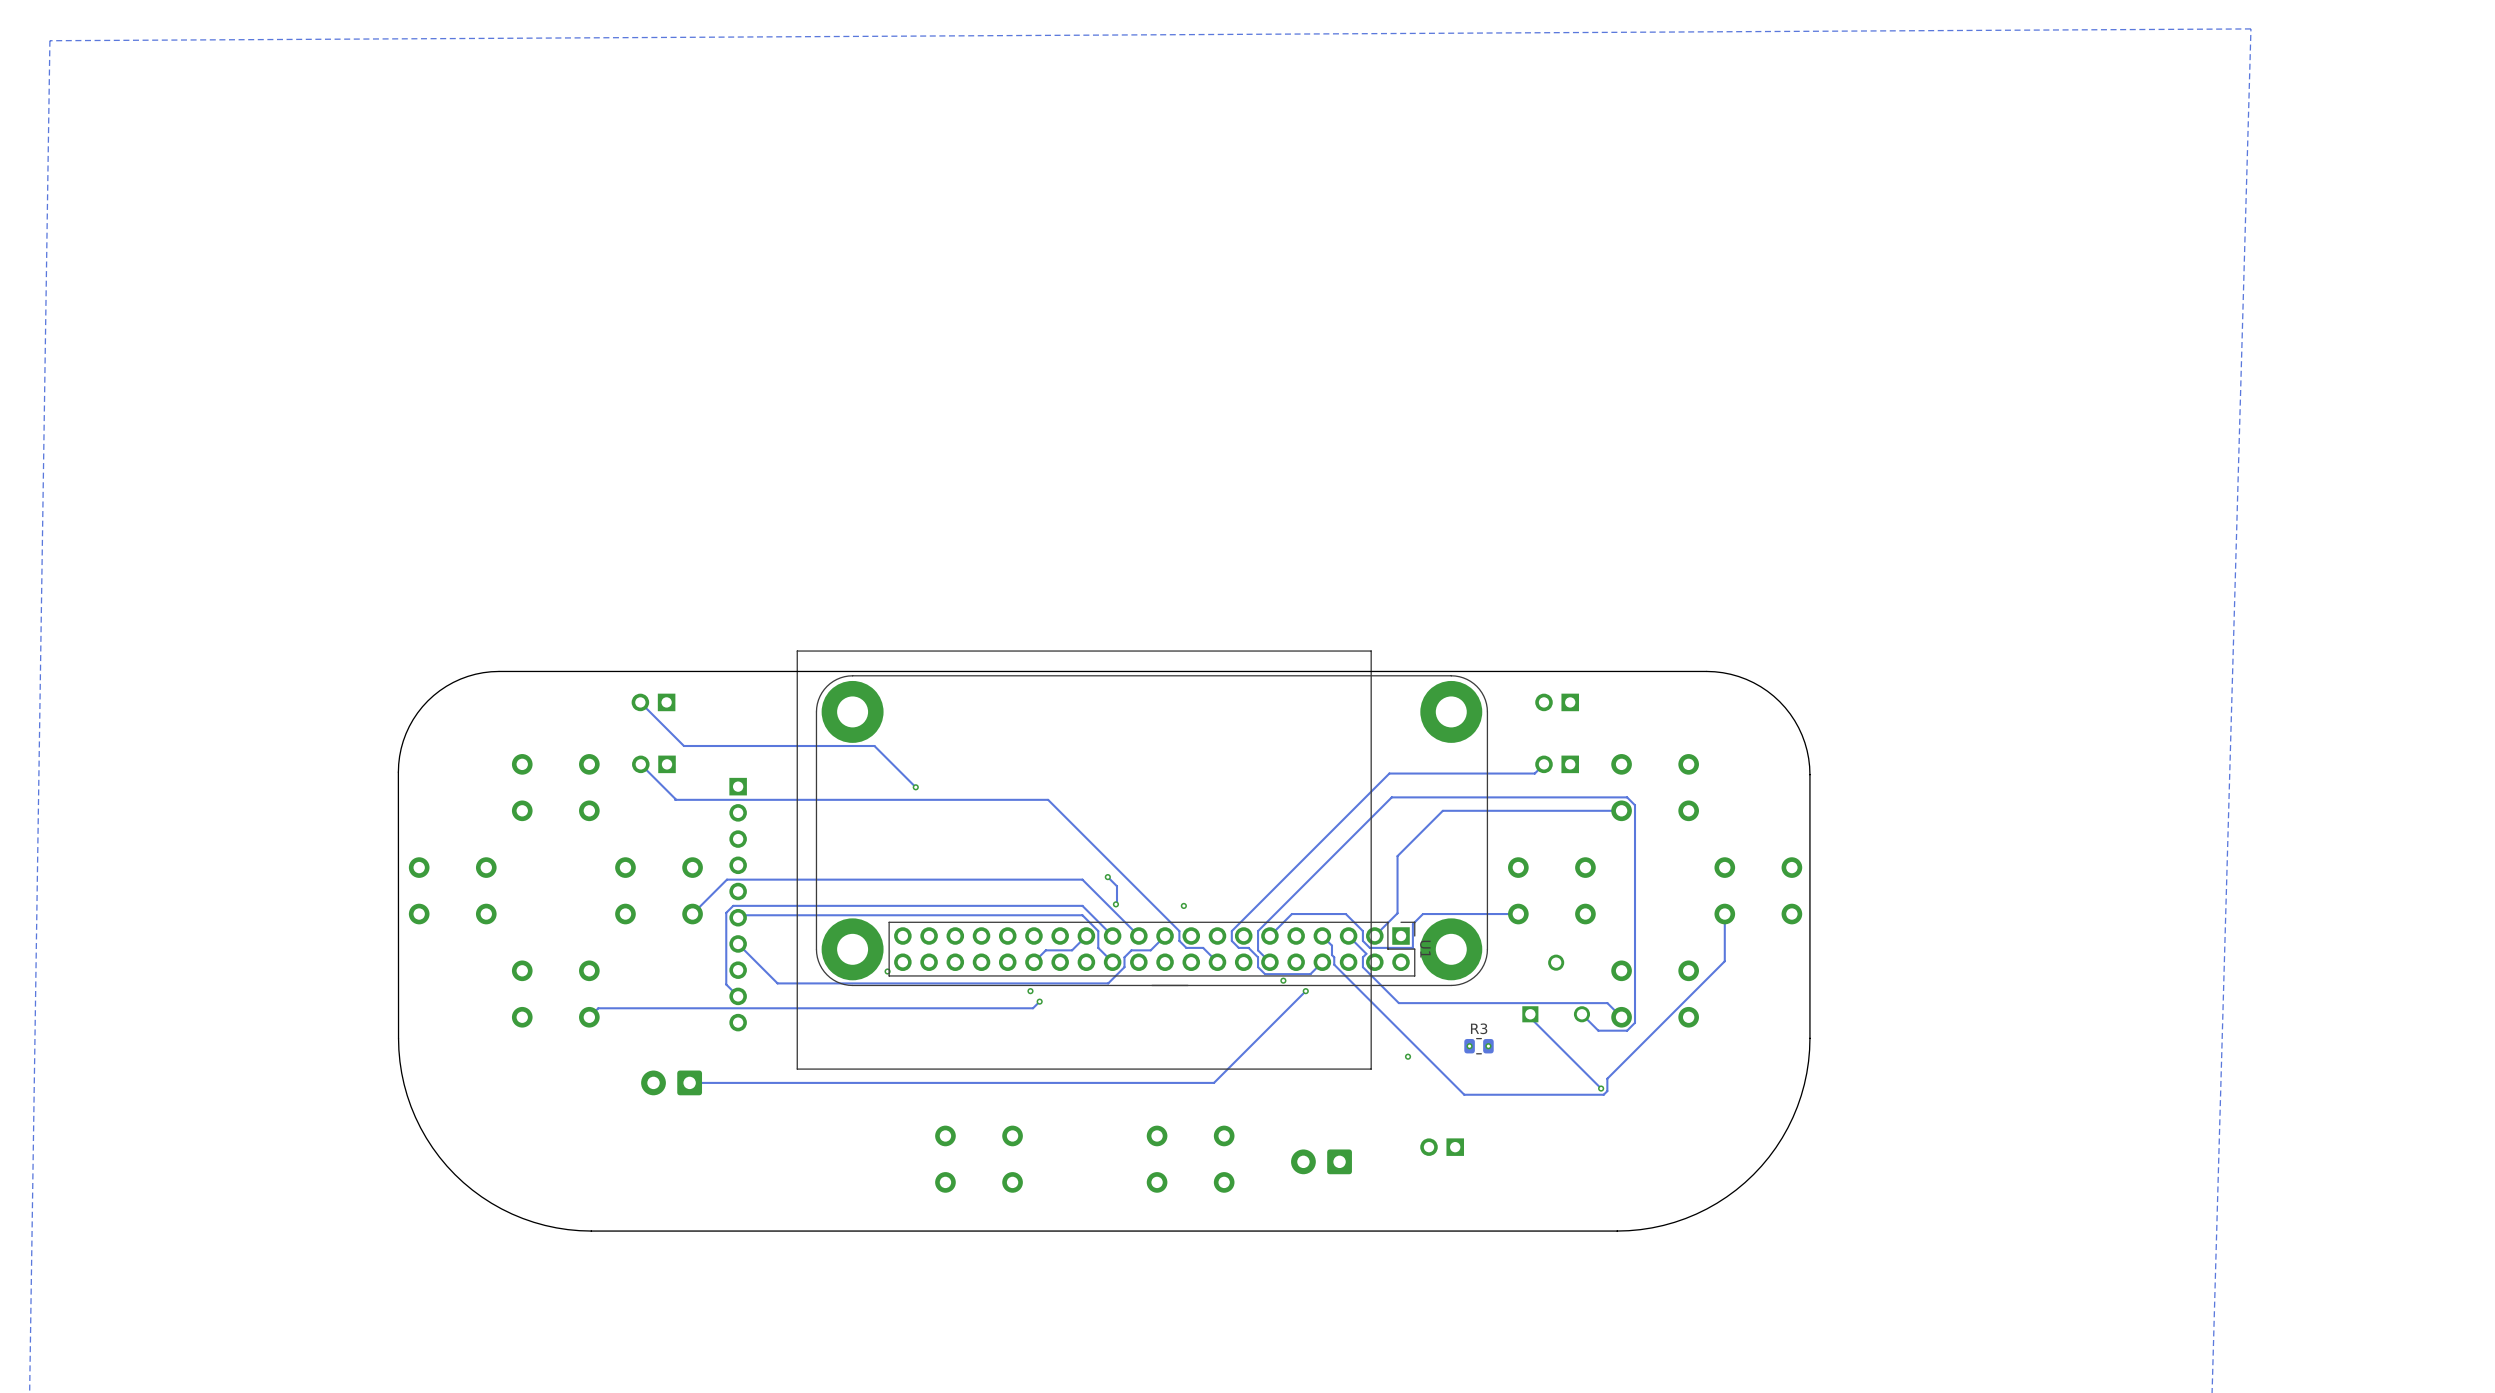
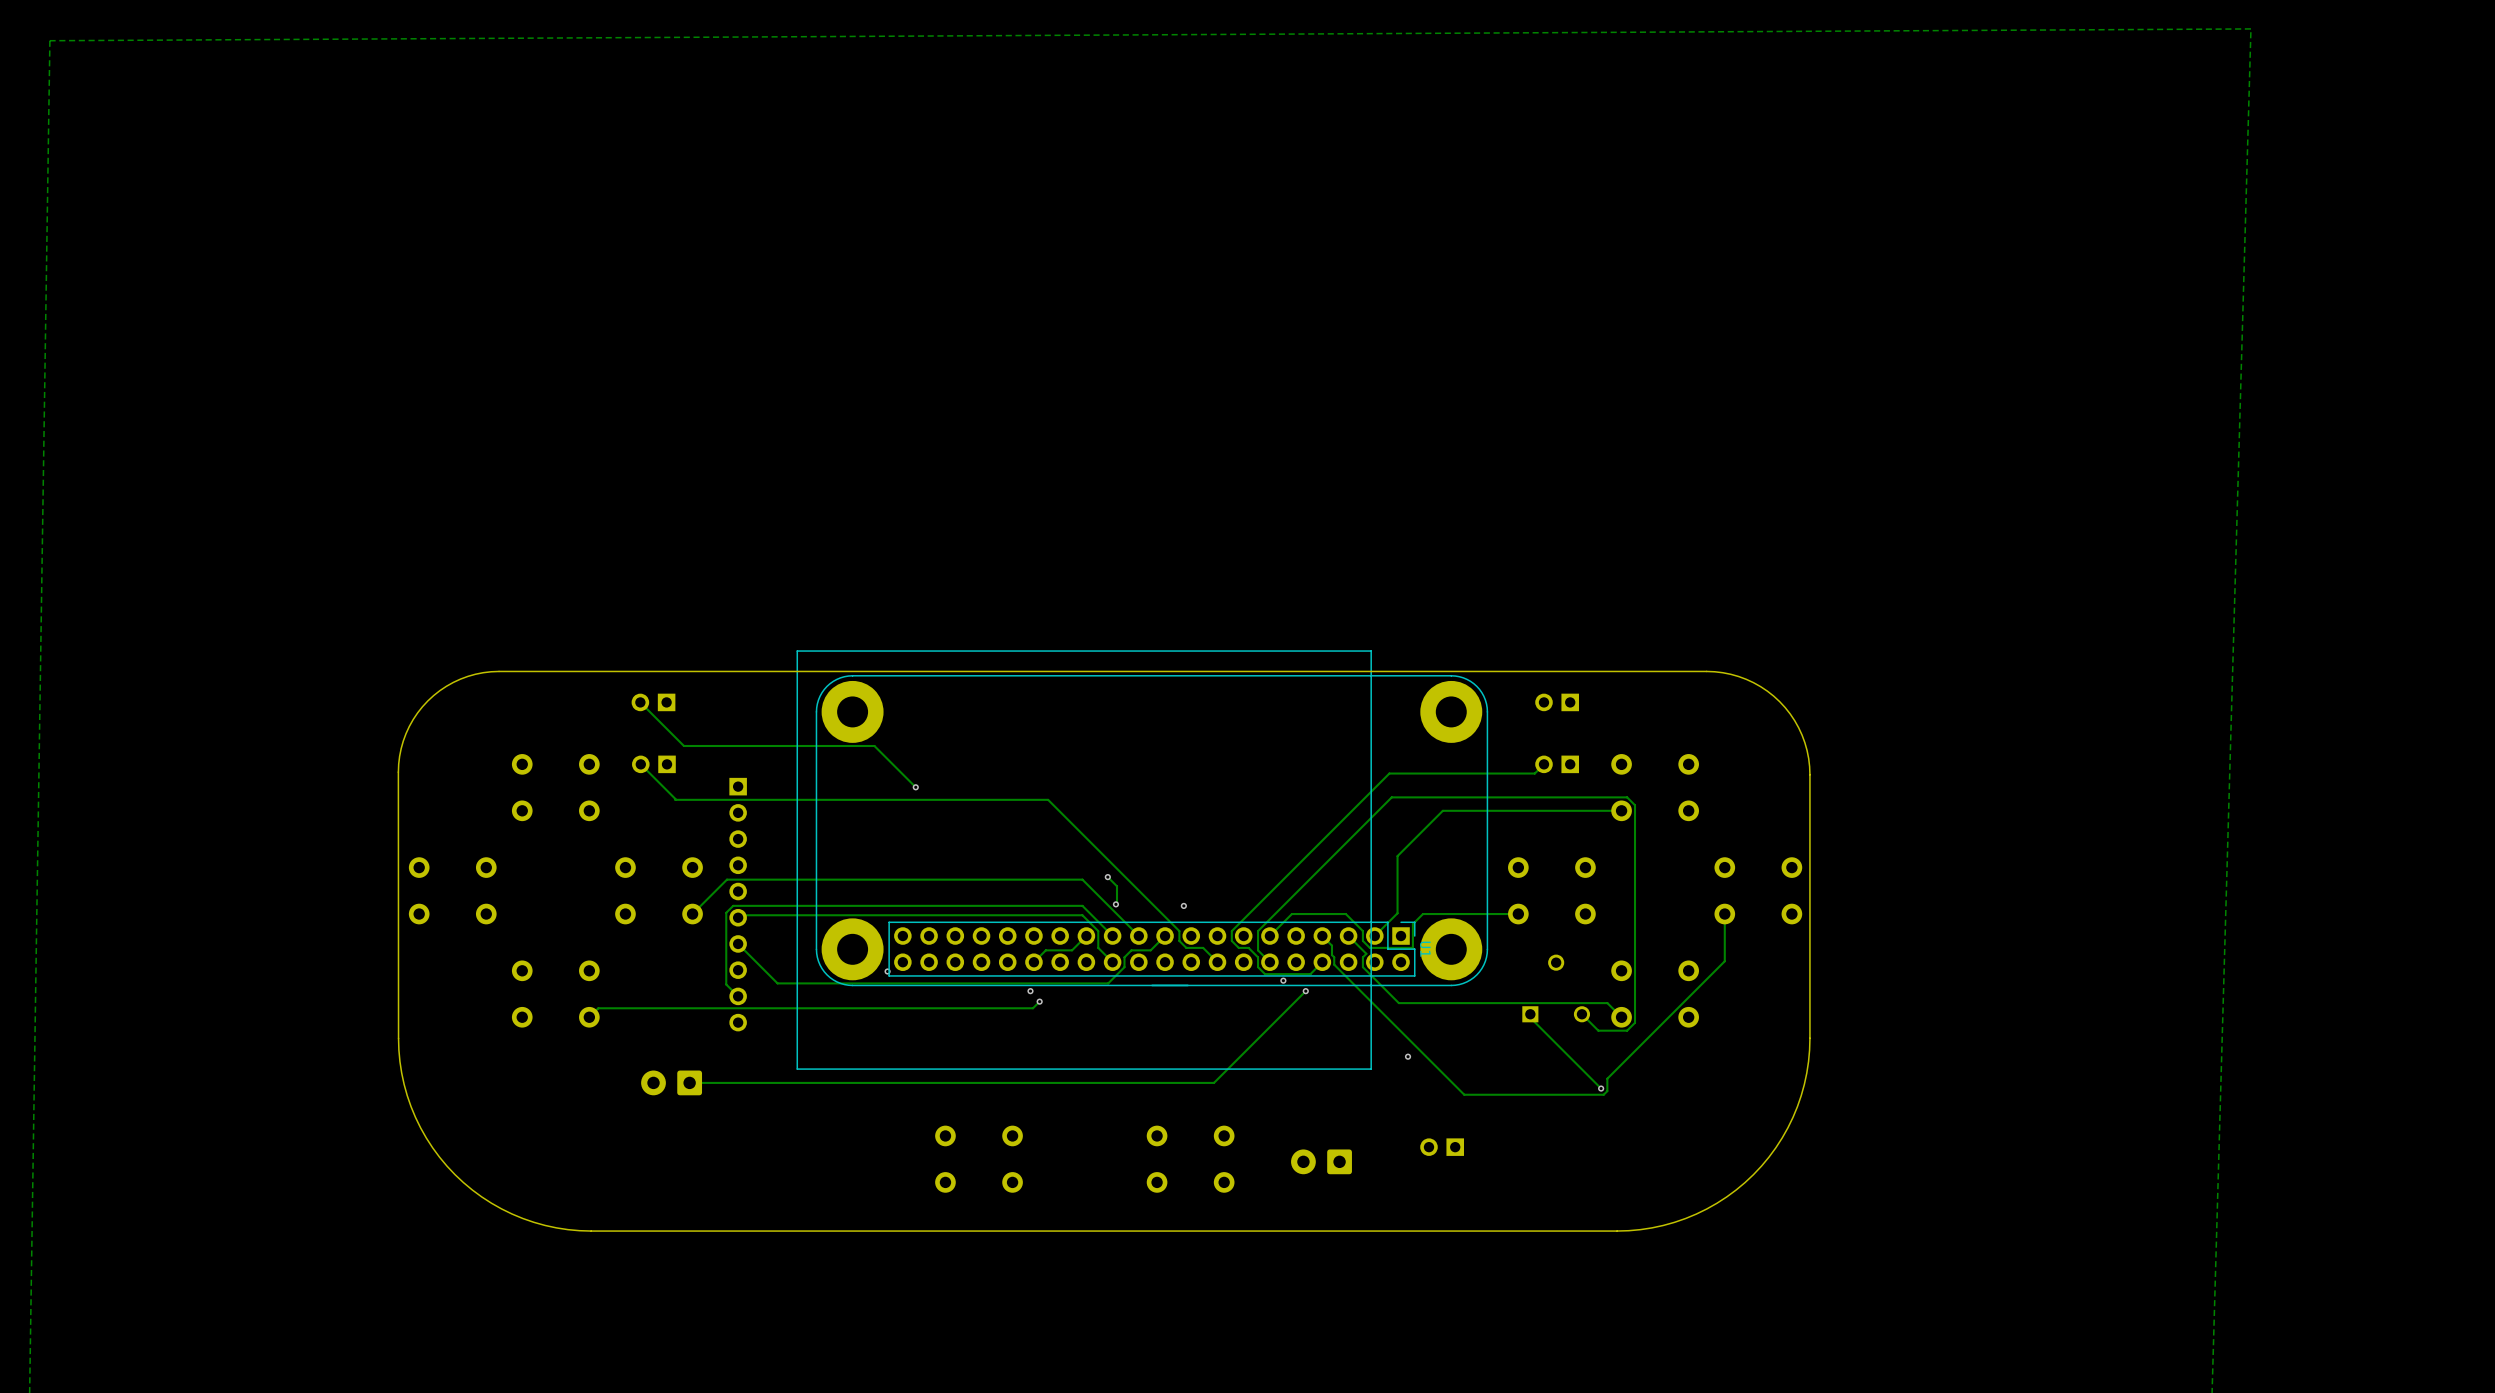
via: (1469, 1046) -> none
R3: (1479, 1046) -> none
via: (1488, 1046) -> none

